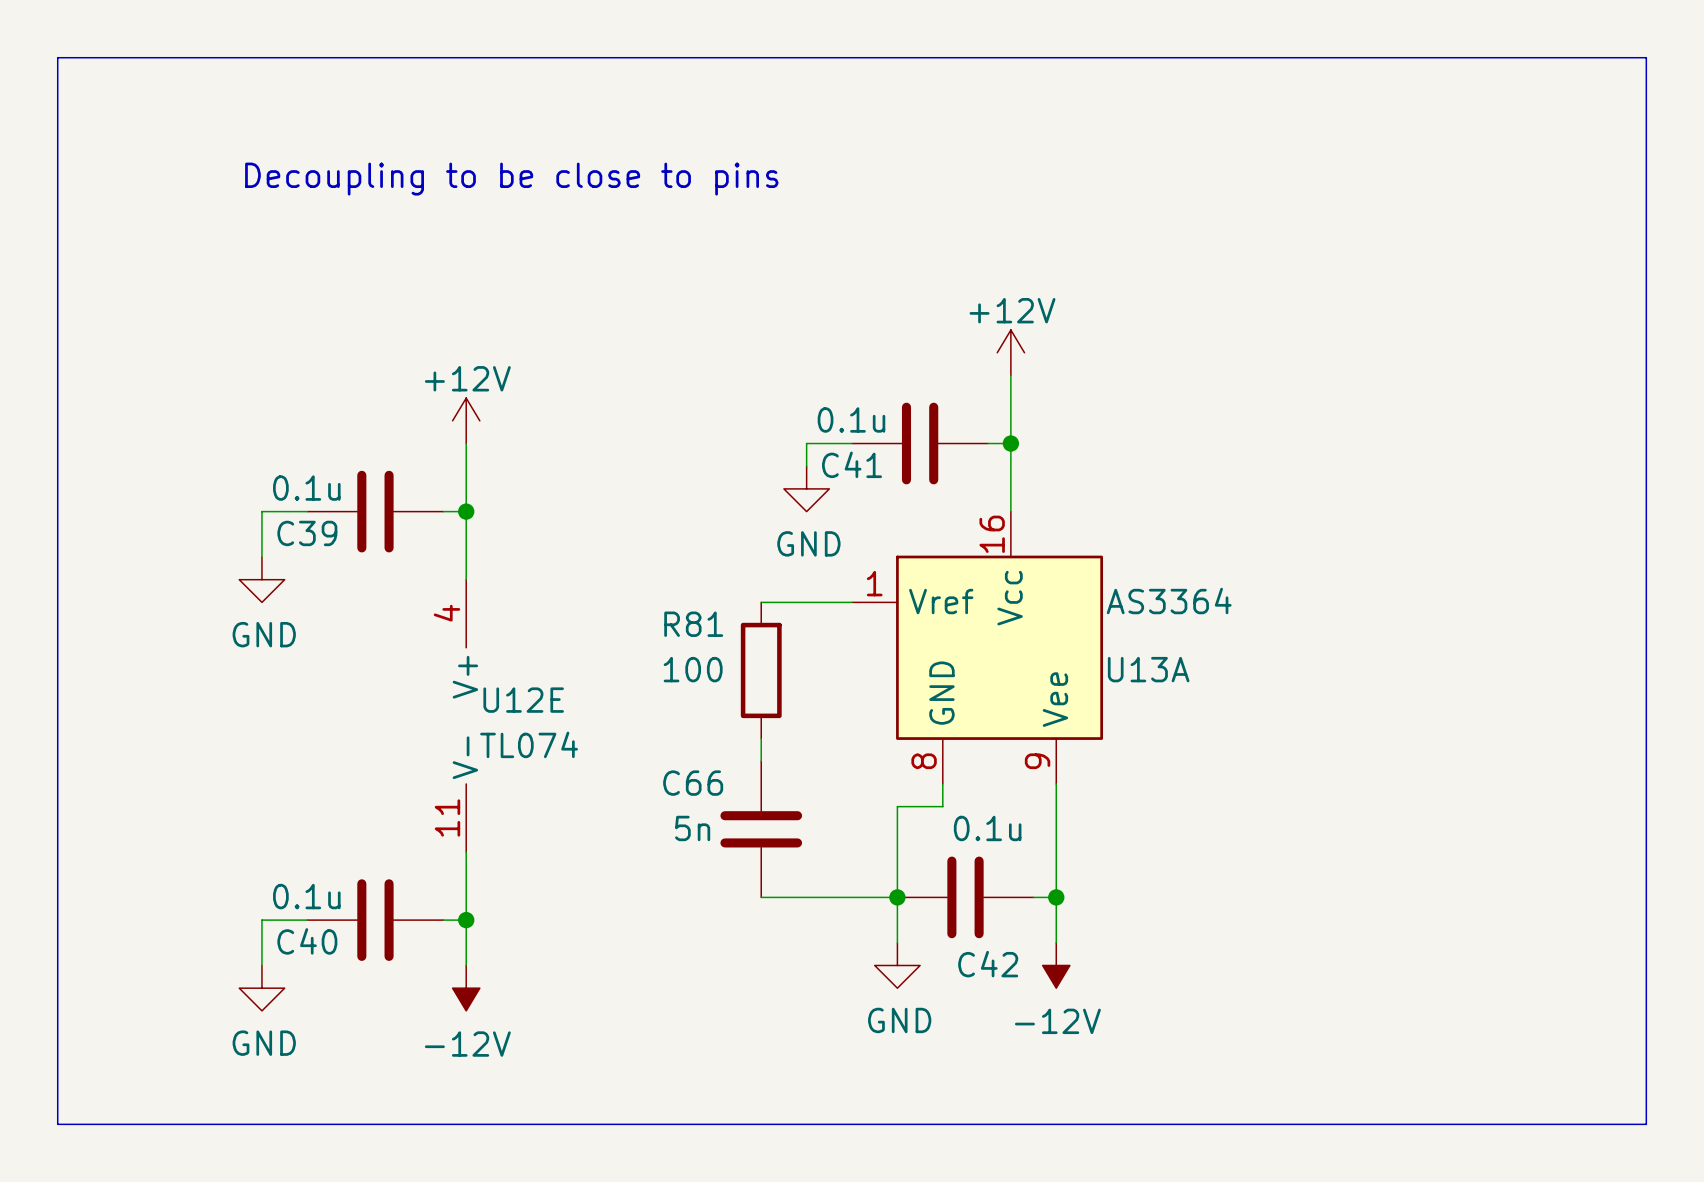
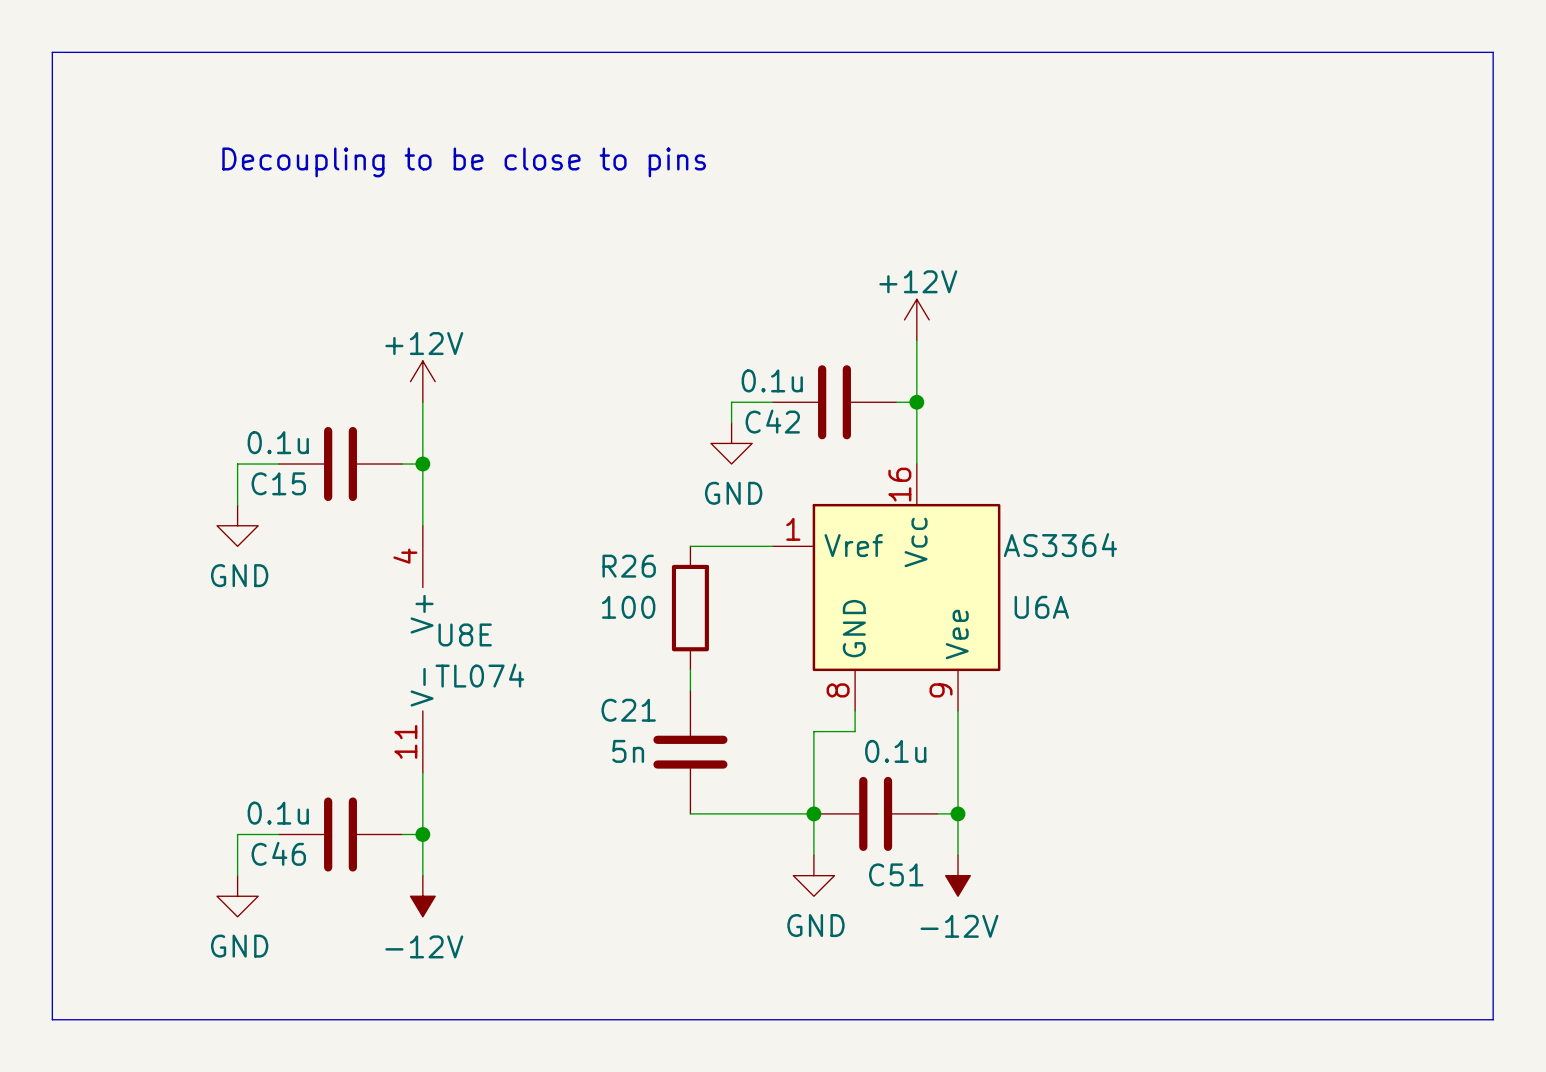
C41 name: C41 (852, 464) -> C42 (772, 421)
C39 name: C39 (307, 533) -> C15 (278, 483)
R81 name: R81 (693, 624) -> R26 (629, 566)
U13A name: U13A (1148, 669) -> U6A (1041, 607)
U12E name: U12E (523, 700) -> U8E (465, 634)
C66 name: C66 (693, 783) -> C21 (628, 710)
C40 name: C40 (307, 941) -> C46 (278, 853)
C42 name: C42 (988, 964) -> C51 (896, 874)

